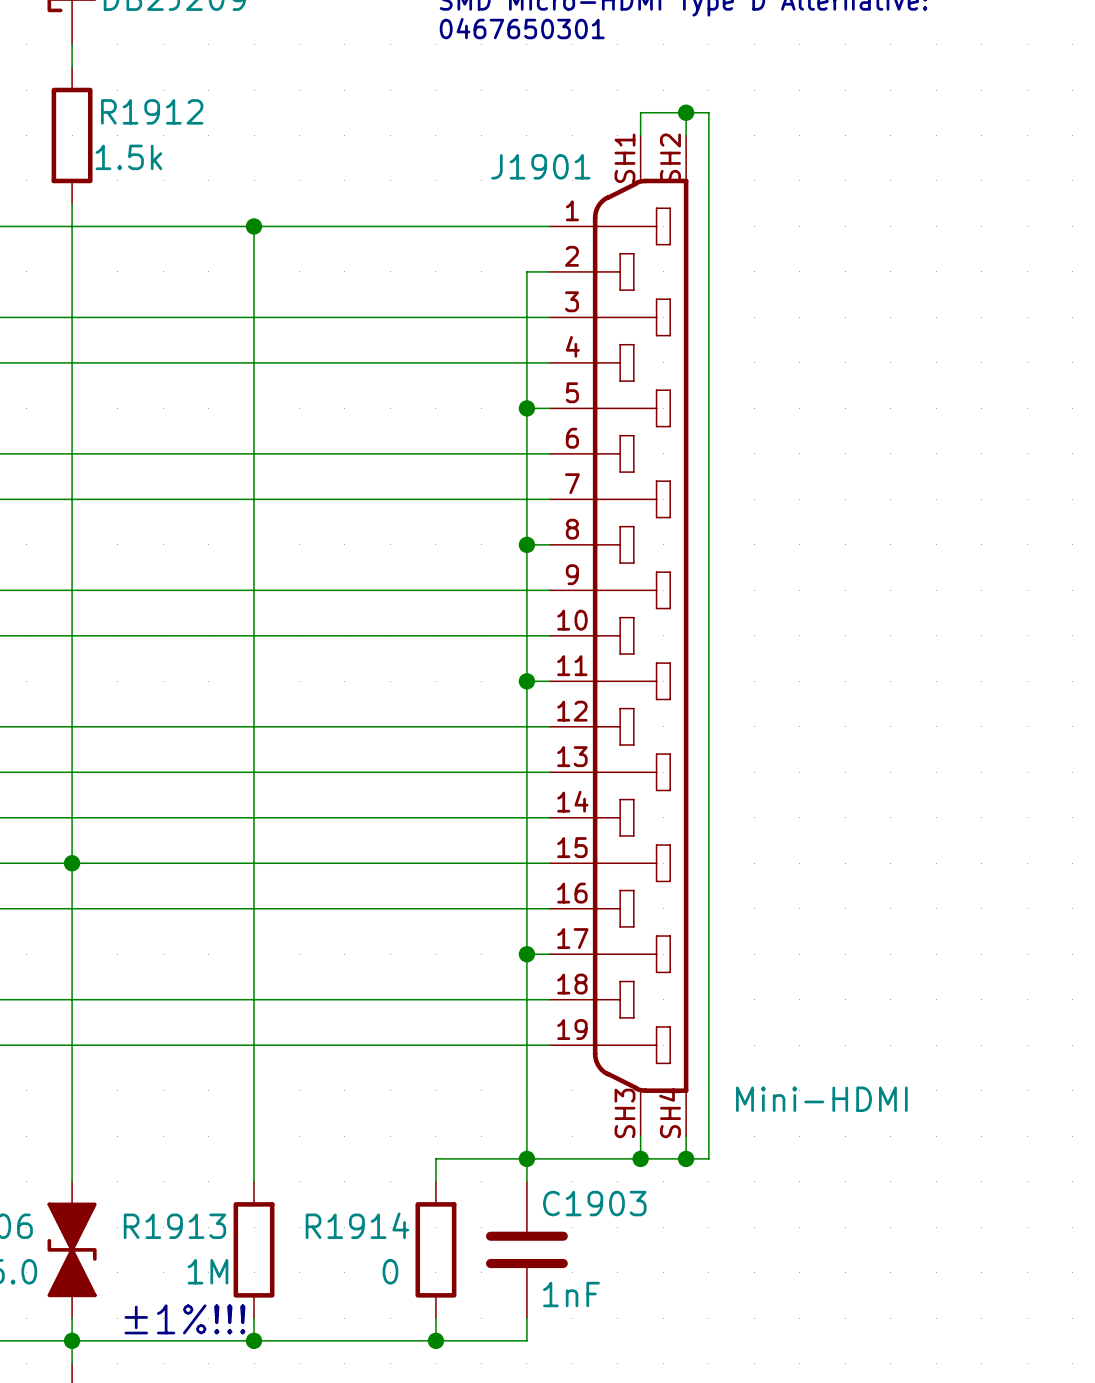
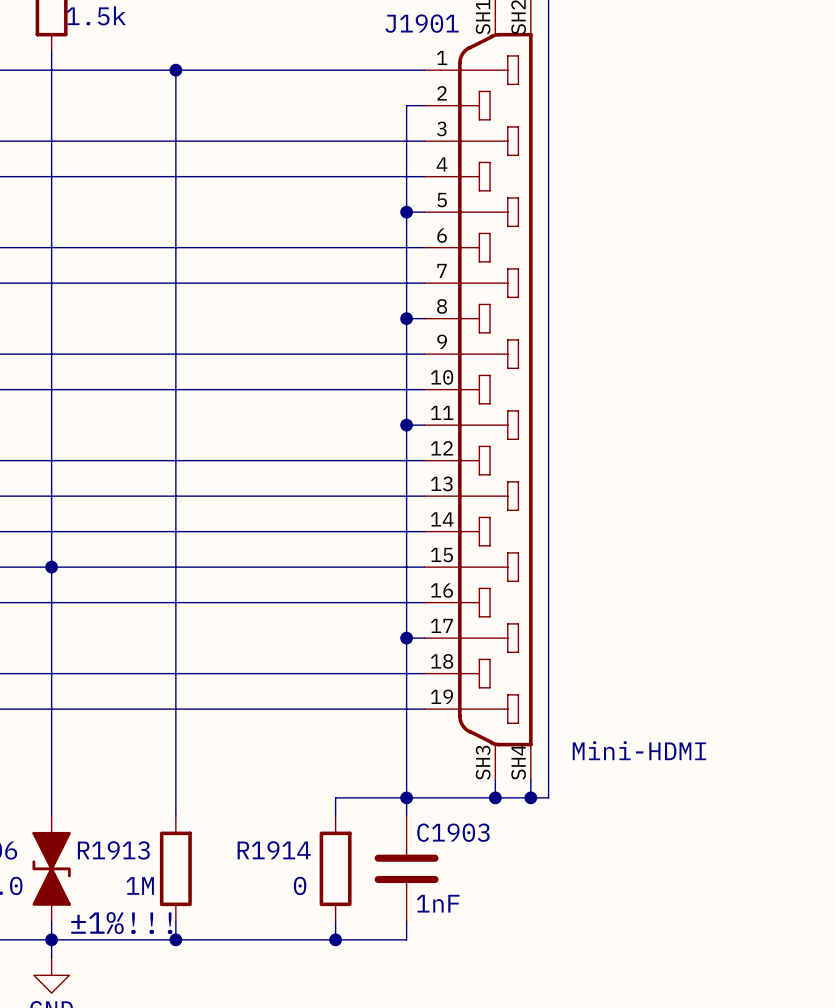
wire: (254, 226) (254, 1181) -> (175, 70) (175, 815)
junction position: (254, 226) -> (175, 70)
R1913 position: (254, 1249) -> (175, 868)
wire: (254, 1318) (254, 1340) -> (175, 922) (175, 939)
text position: ±1%!!! (184, 1319) -> ±1%!!! (121, 923)
junction position: (254, 1340) -> (175, 939)

